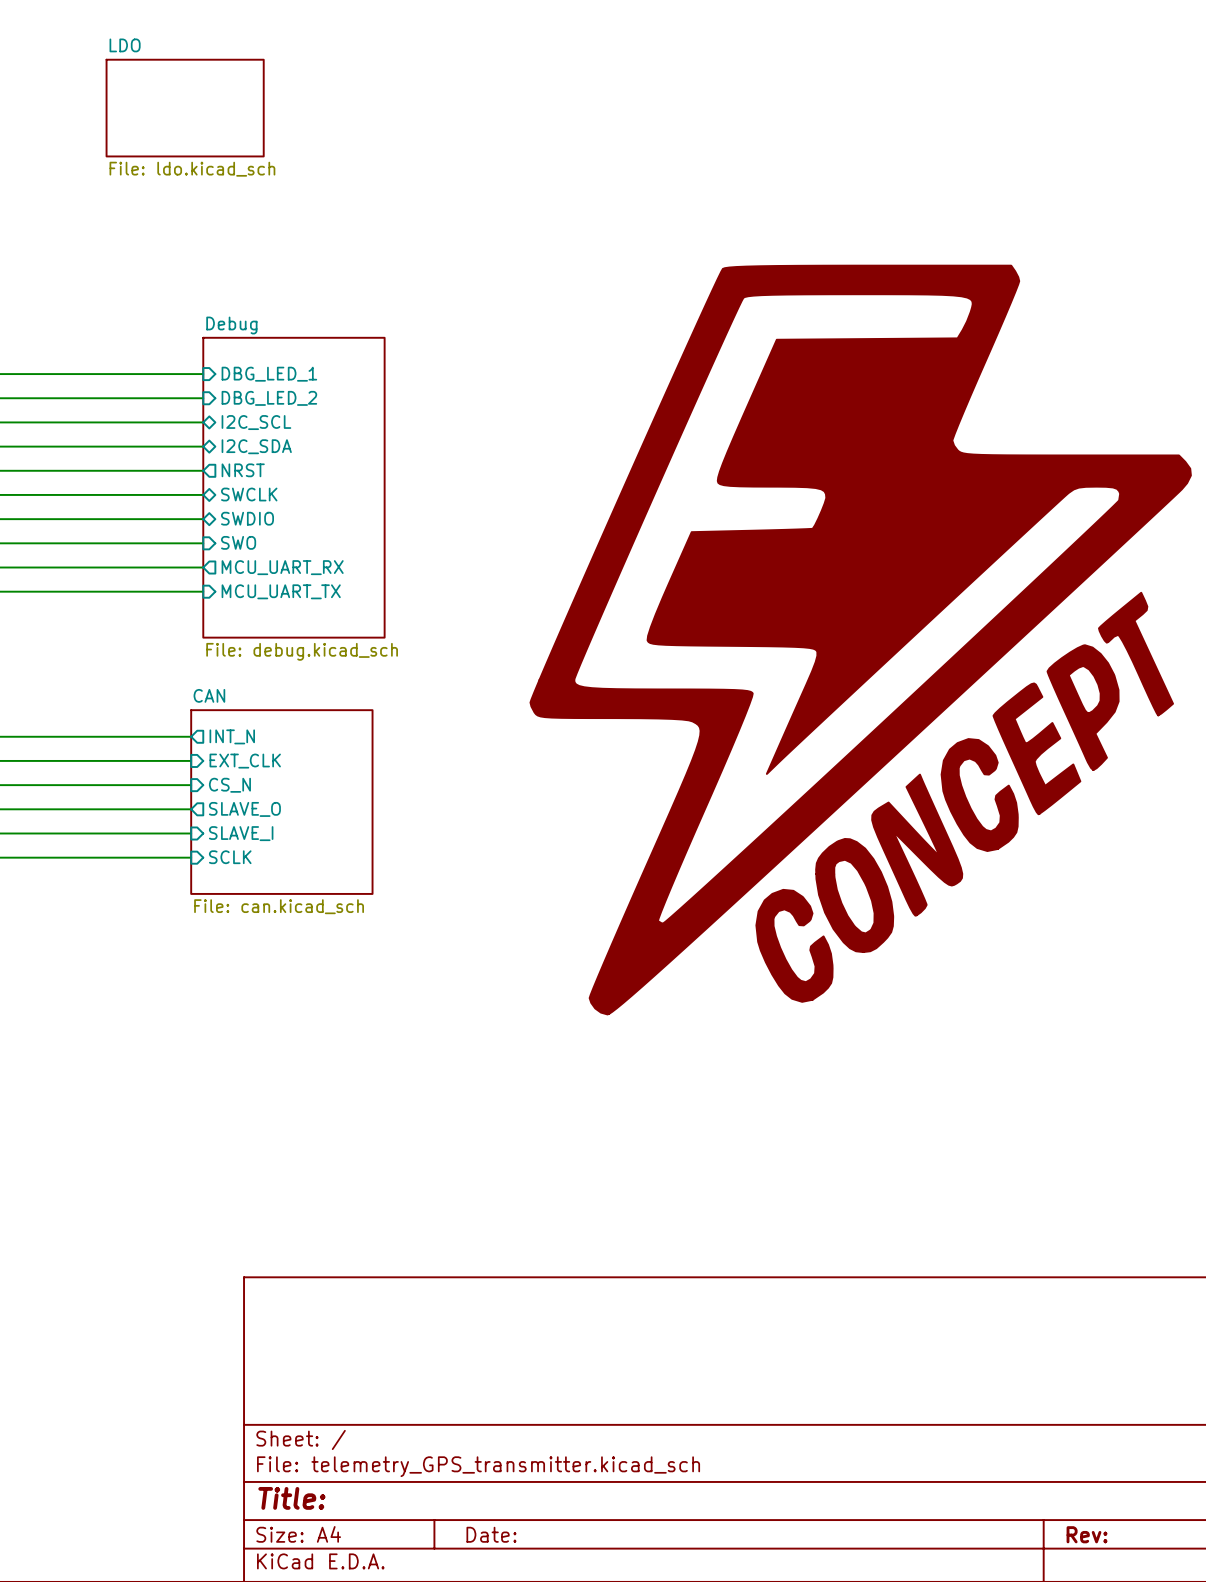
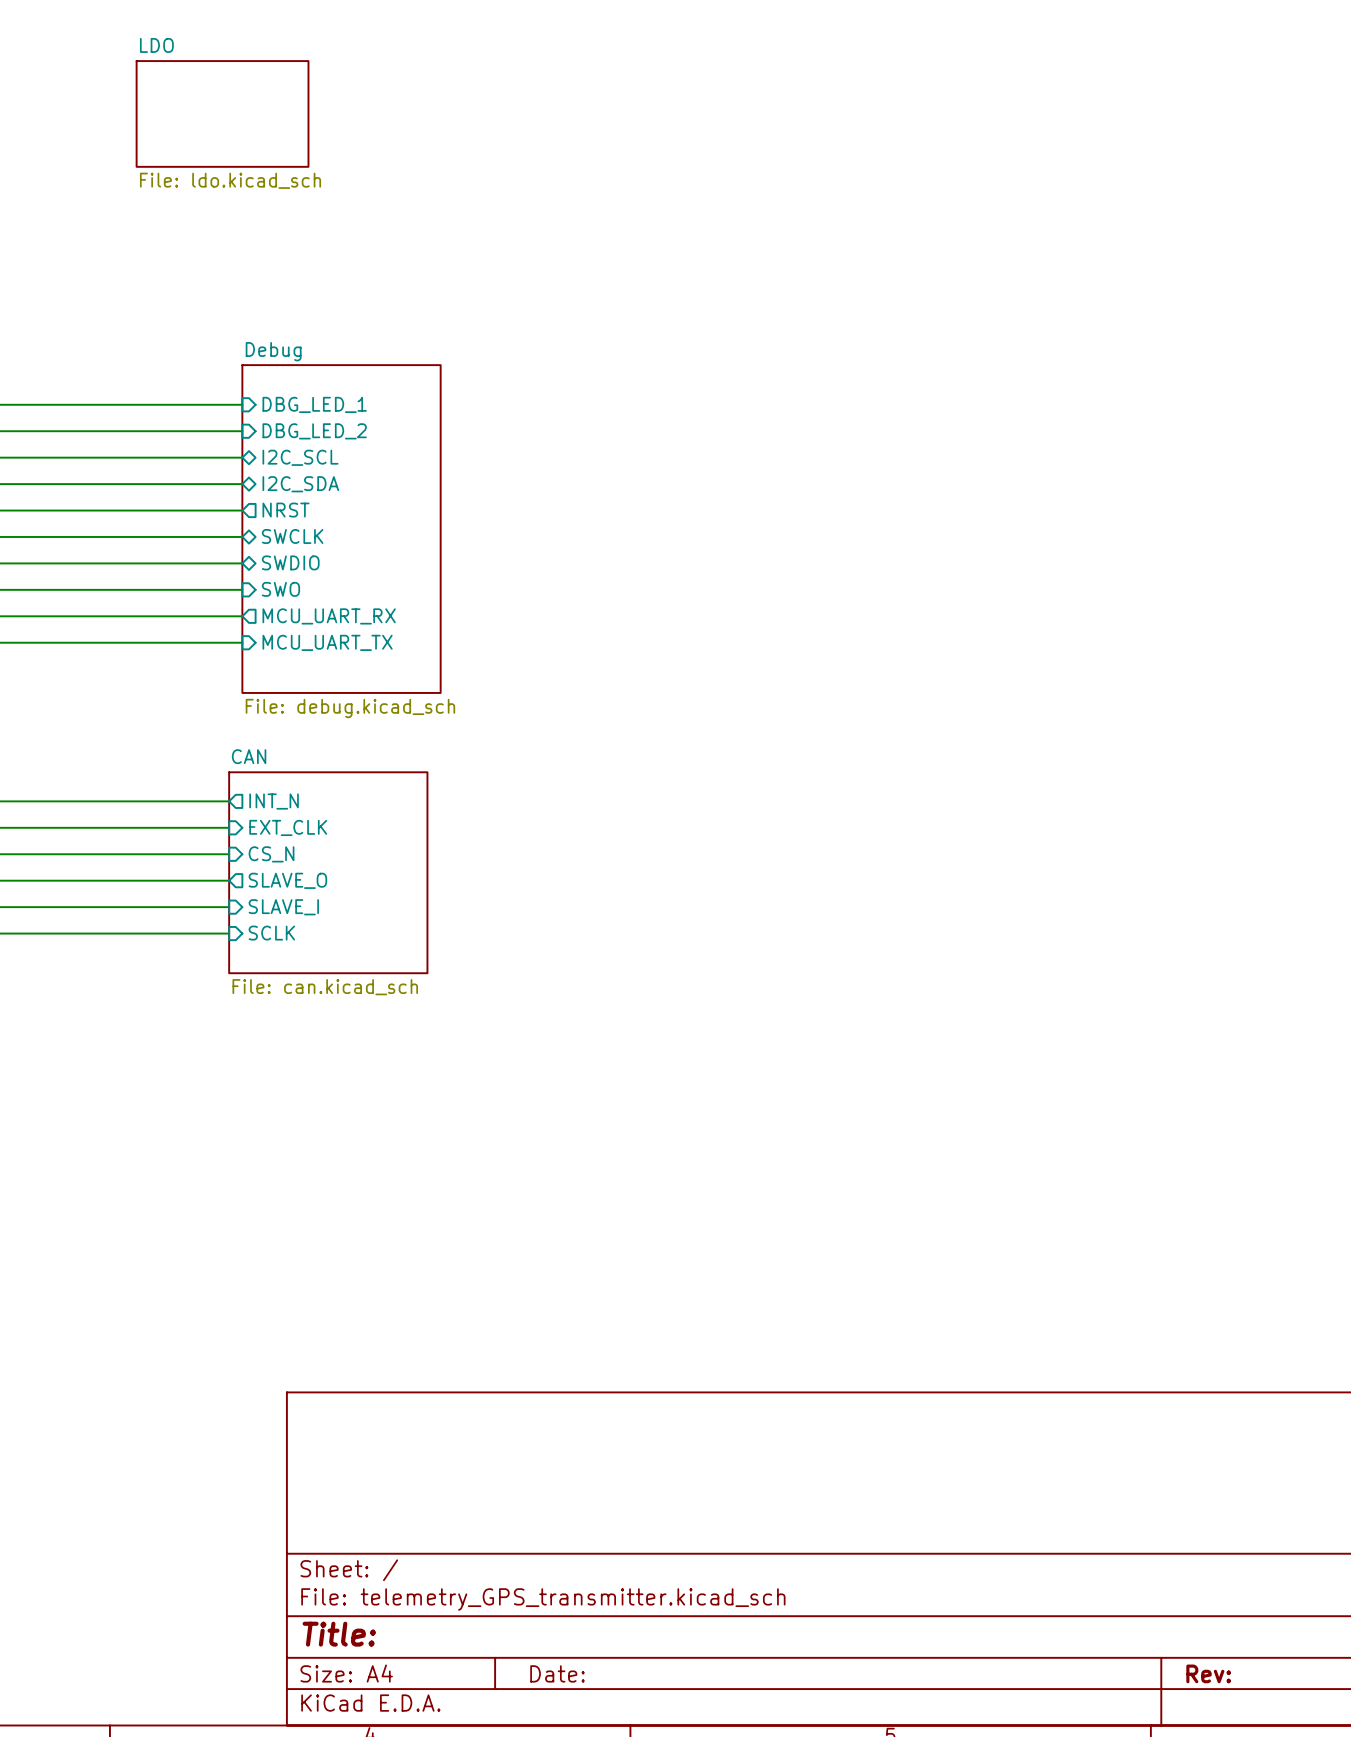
power symbol: (860, 640) -> none

